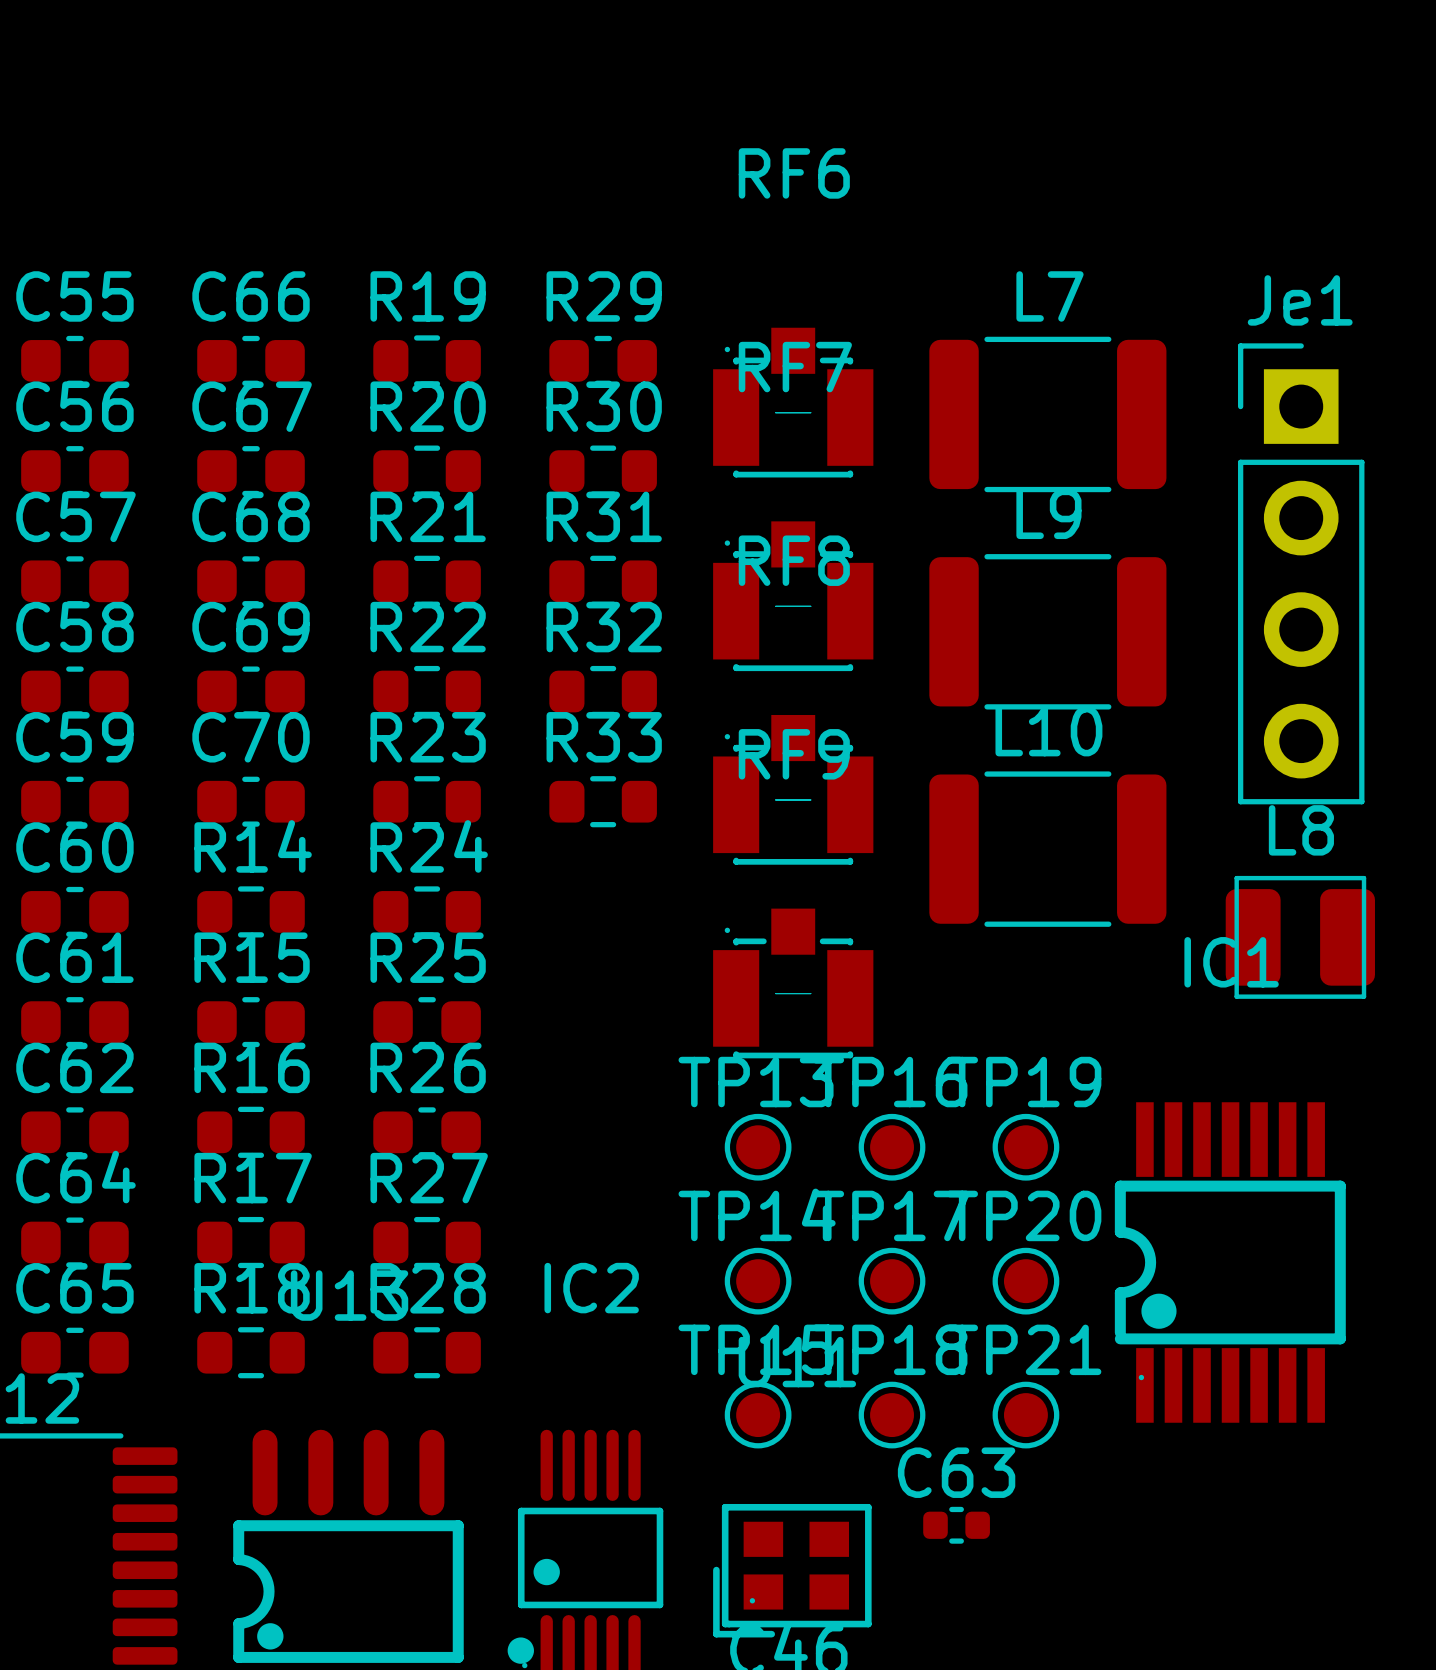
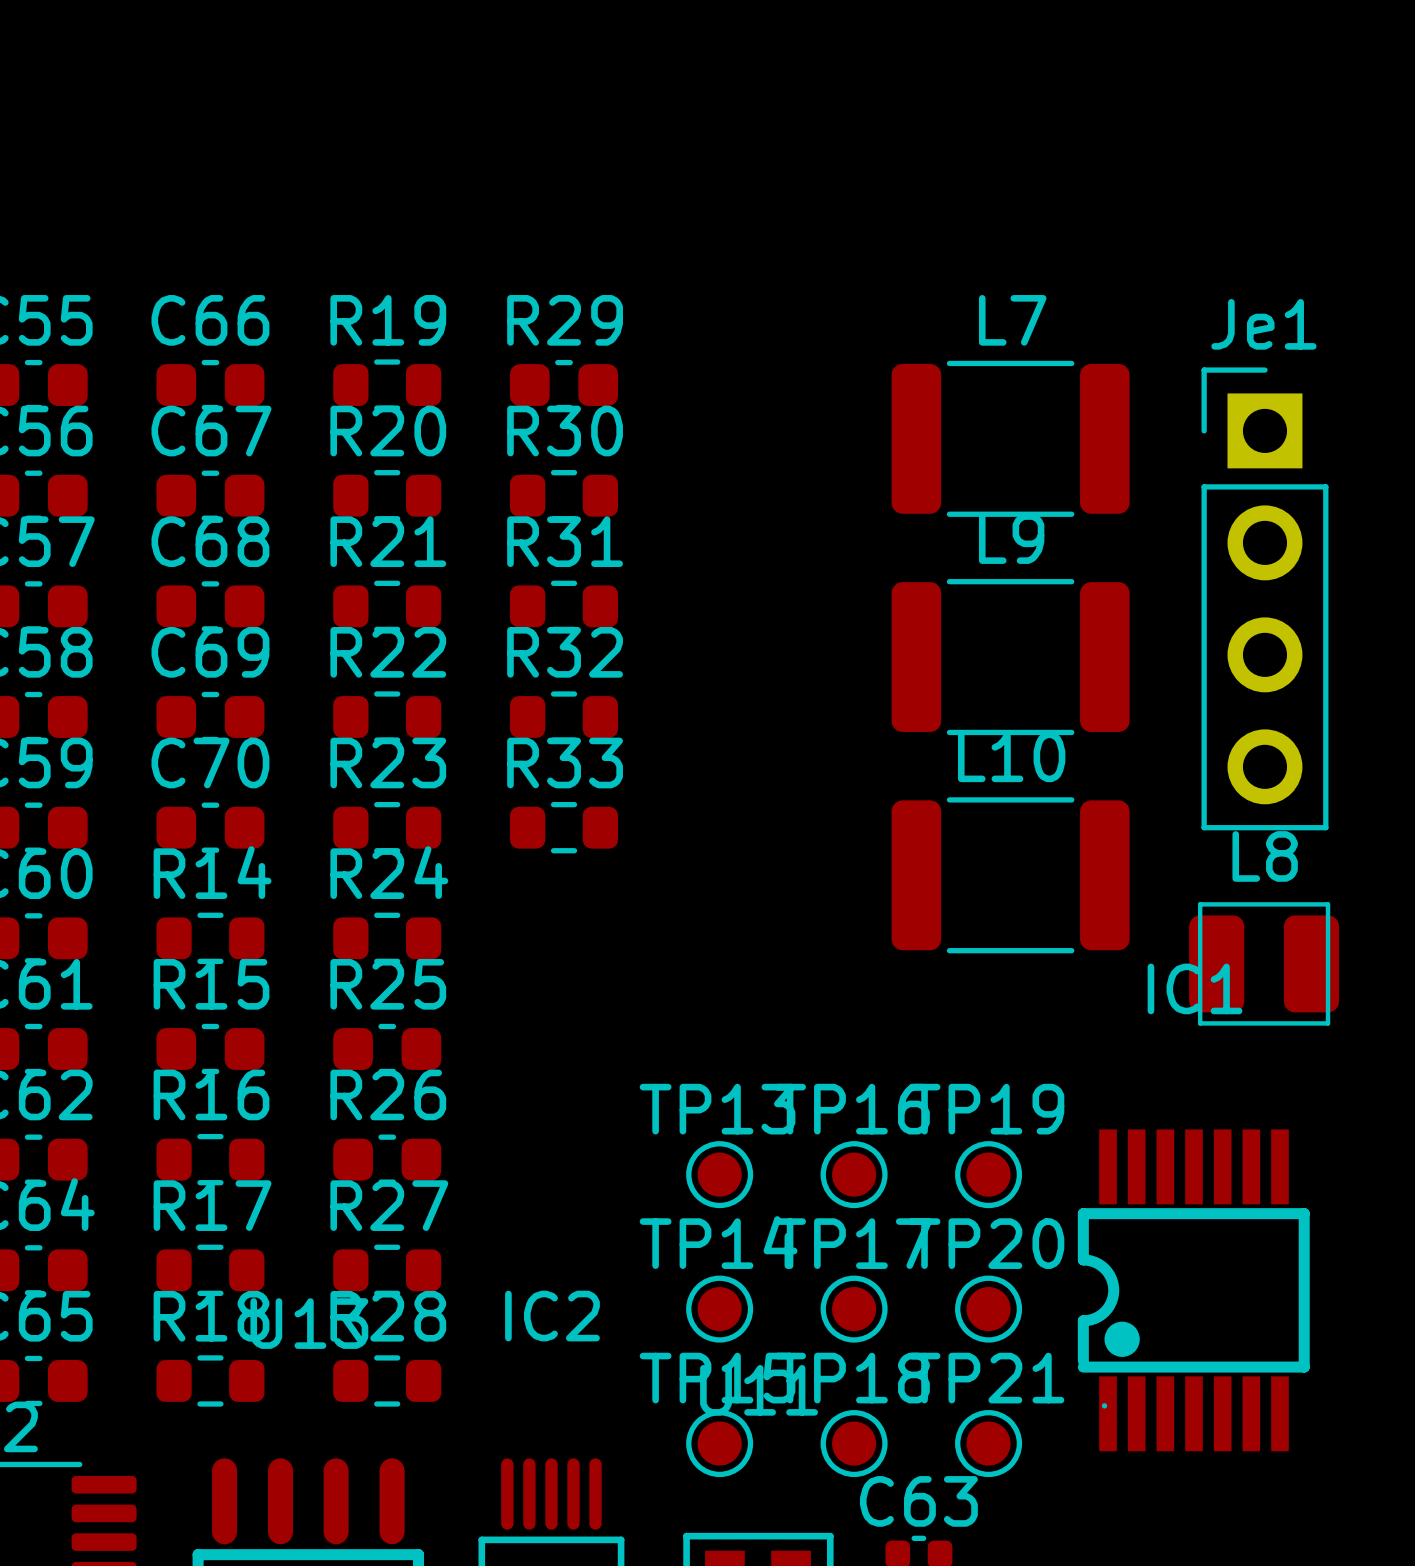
RF6: (793, 402) -> none
RF7: (793, 596) -> none
RF8: (793, 789) -> none
RF9: (793, 983) -> none

